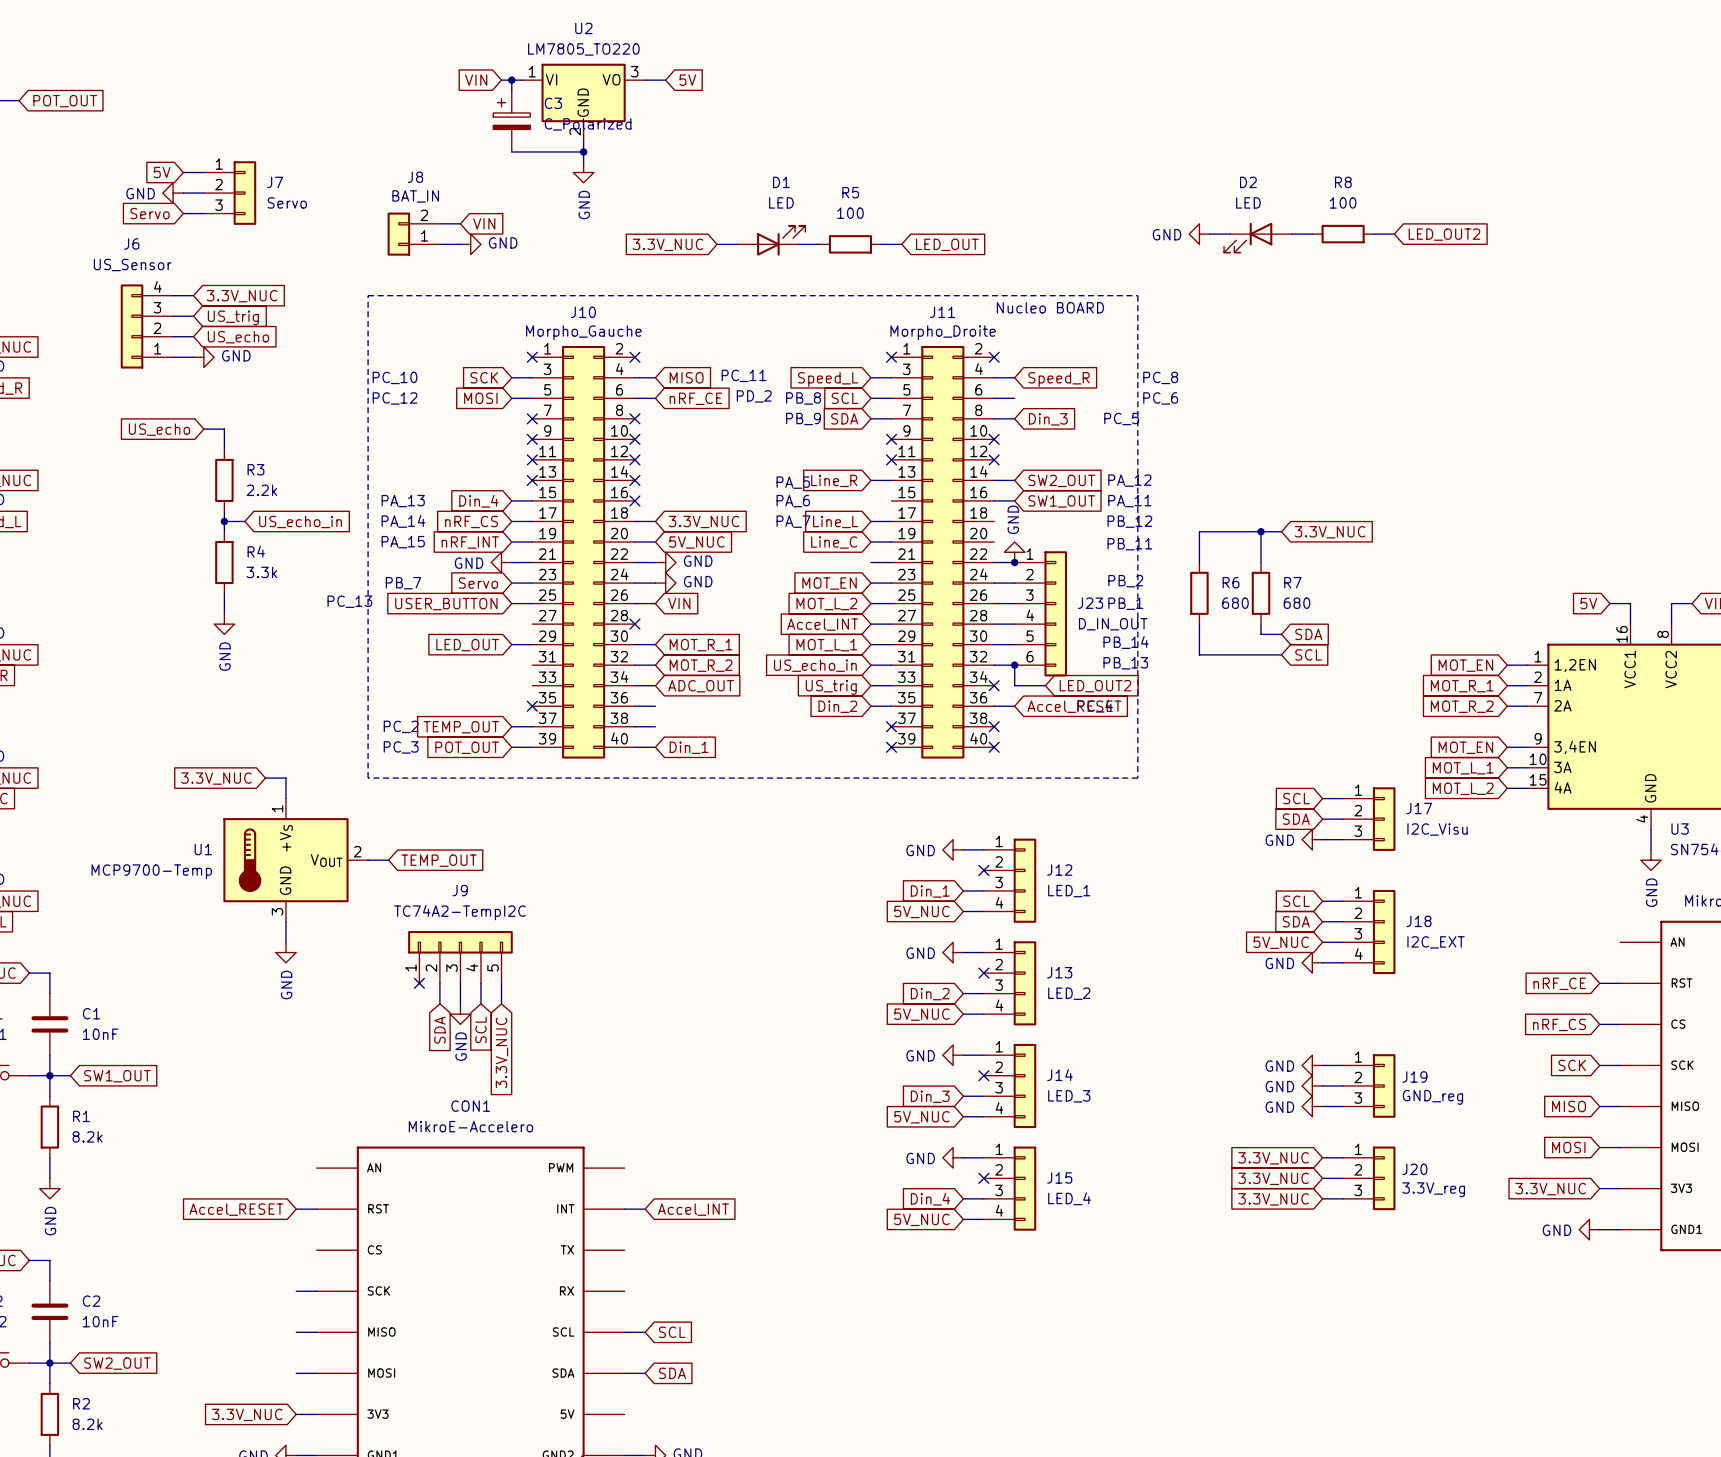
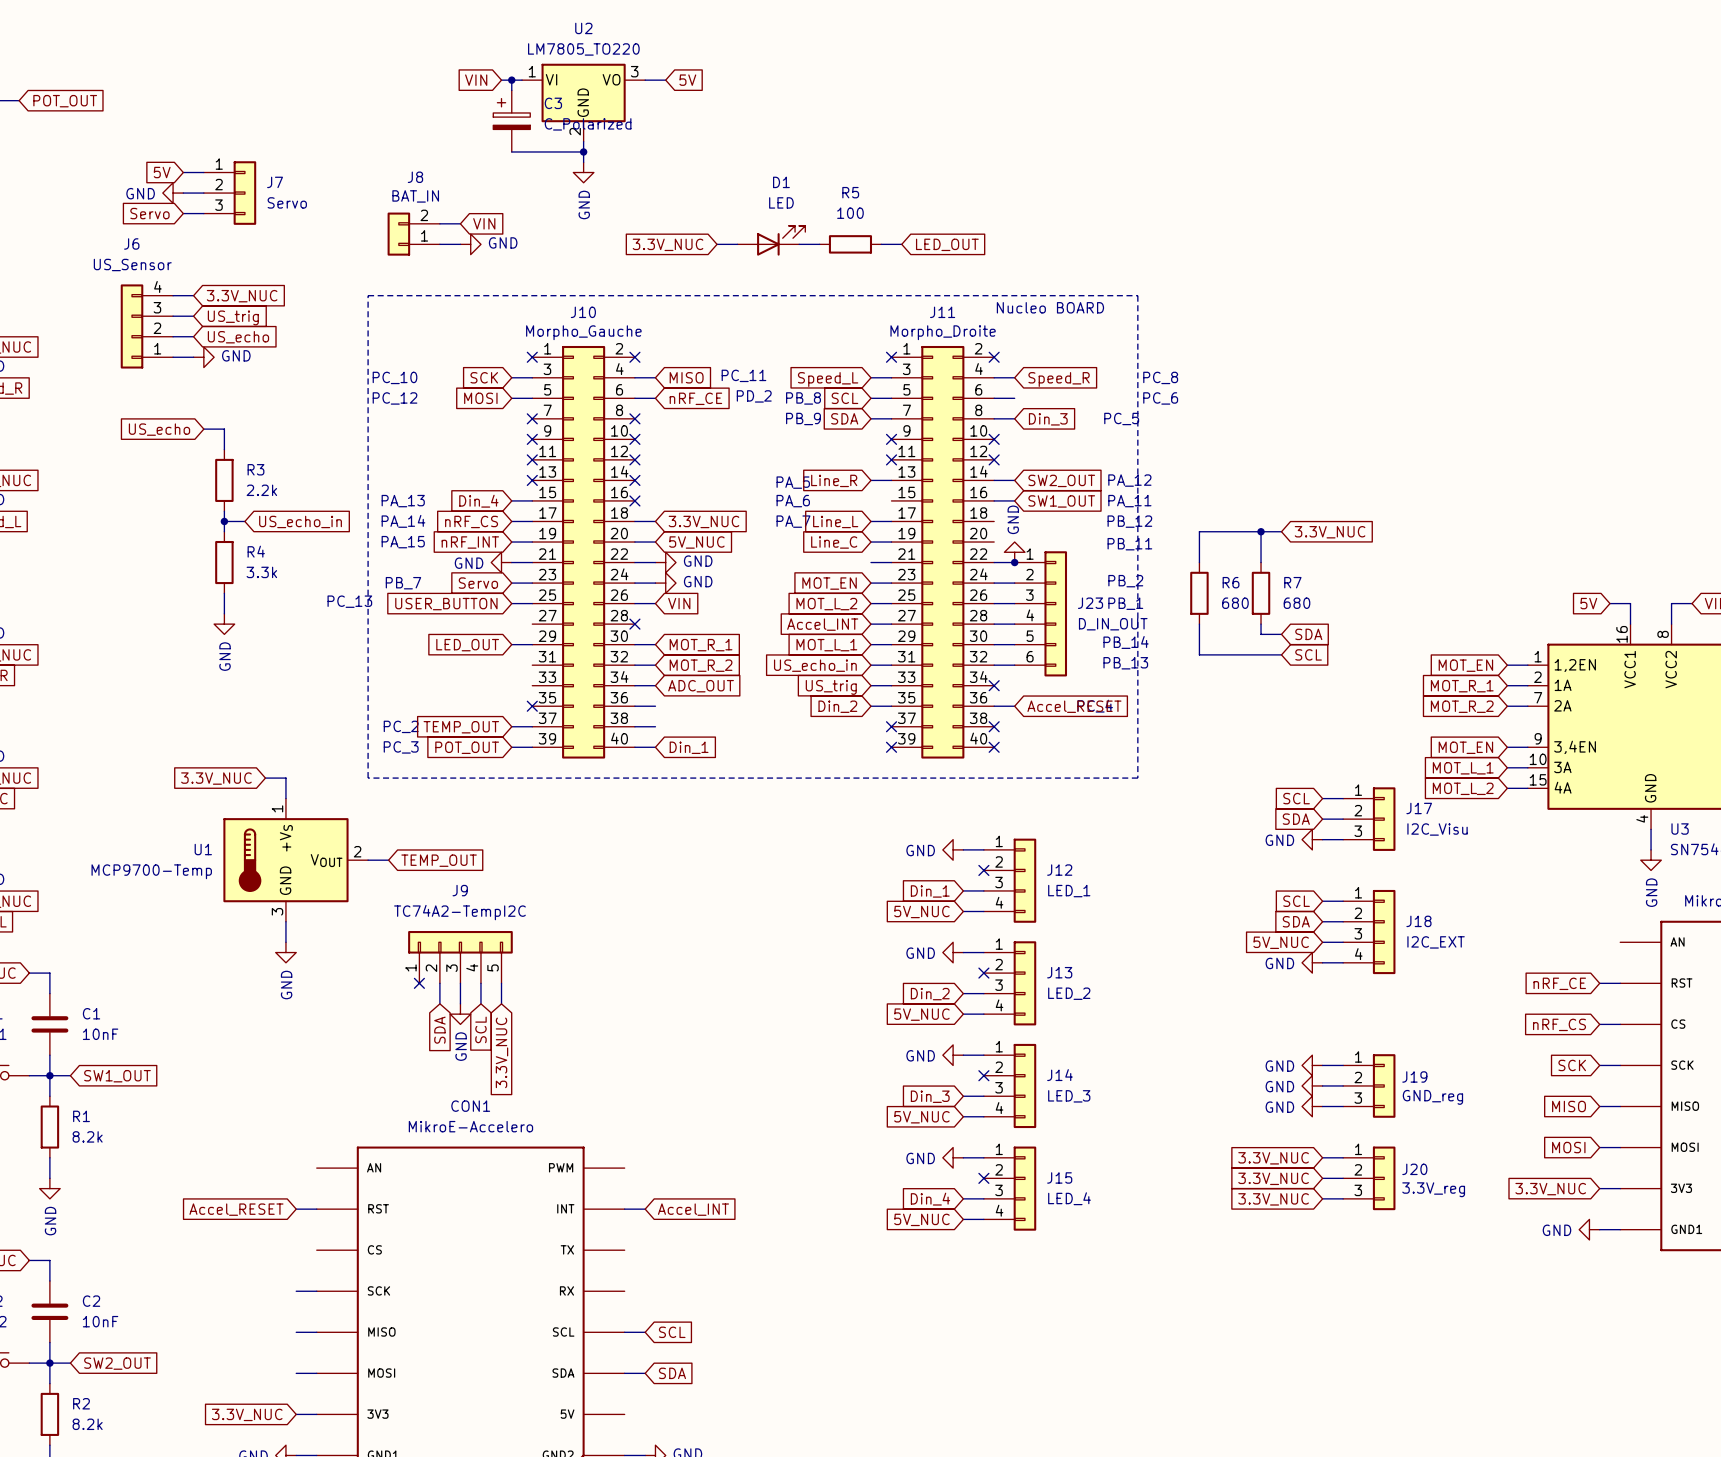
power symbol: GND (1199, 234) -> none
wire: (1209, 234) (1230, 234) -> none
wire: (1291, 234) (1312, 234) -> none
R8: 100 (1343, 234) -> none
wire: (1373, 234) (1394, 234) -> none
global label: LED_OUT2 (1444, 234) -> none
D2: LED (1257, 237) -> none
wire: (1014, 665) (1014, 685) (1045, 685) -> none
junction: (1014, 665) -> none
global label: LED_OUT2 (1095, 686) -> none

